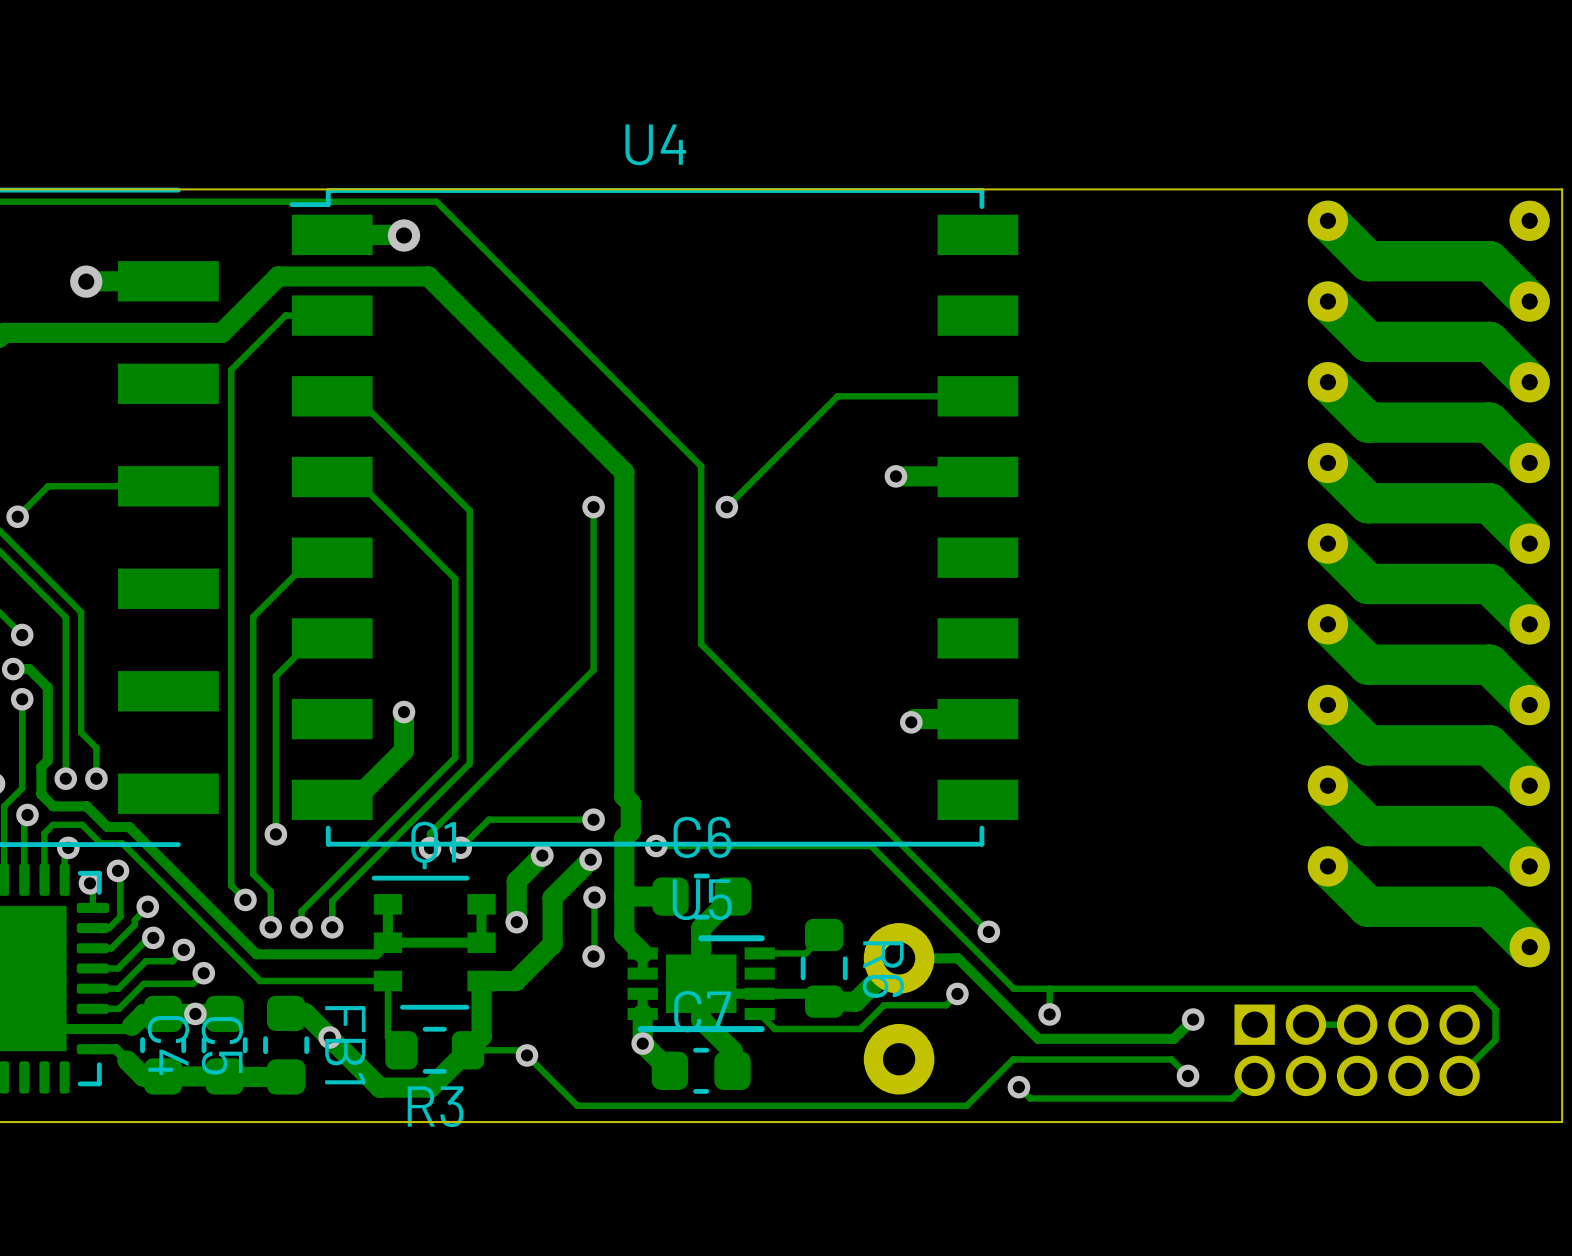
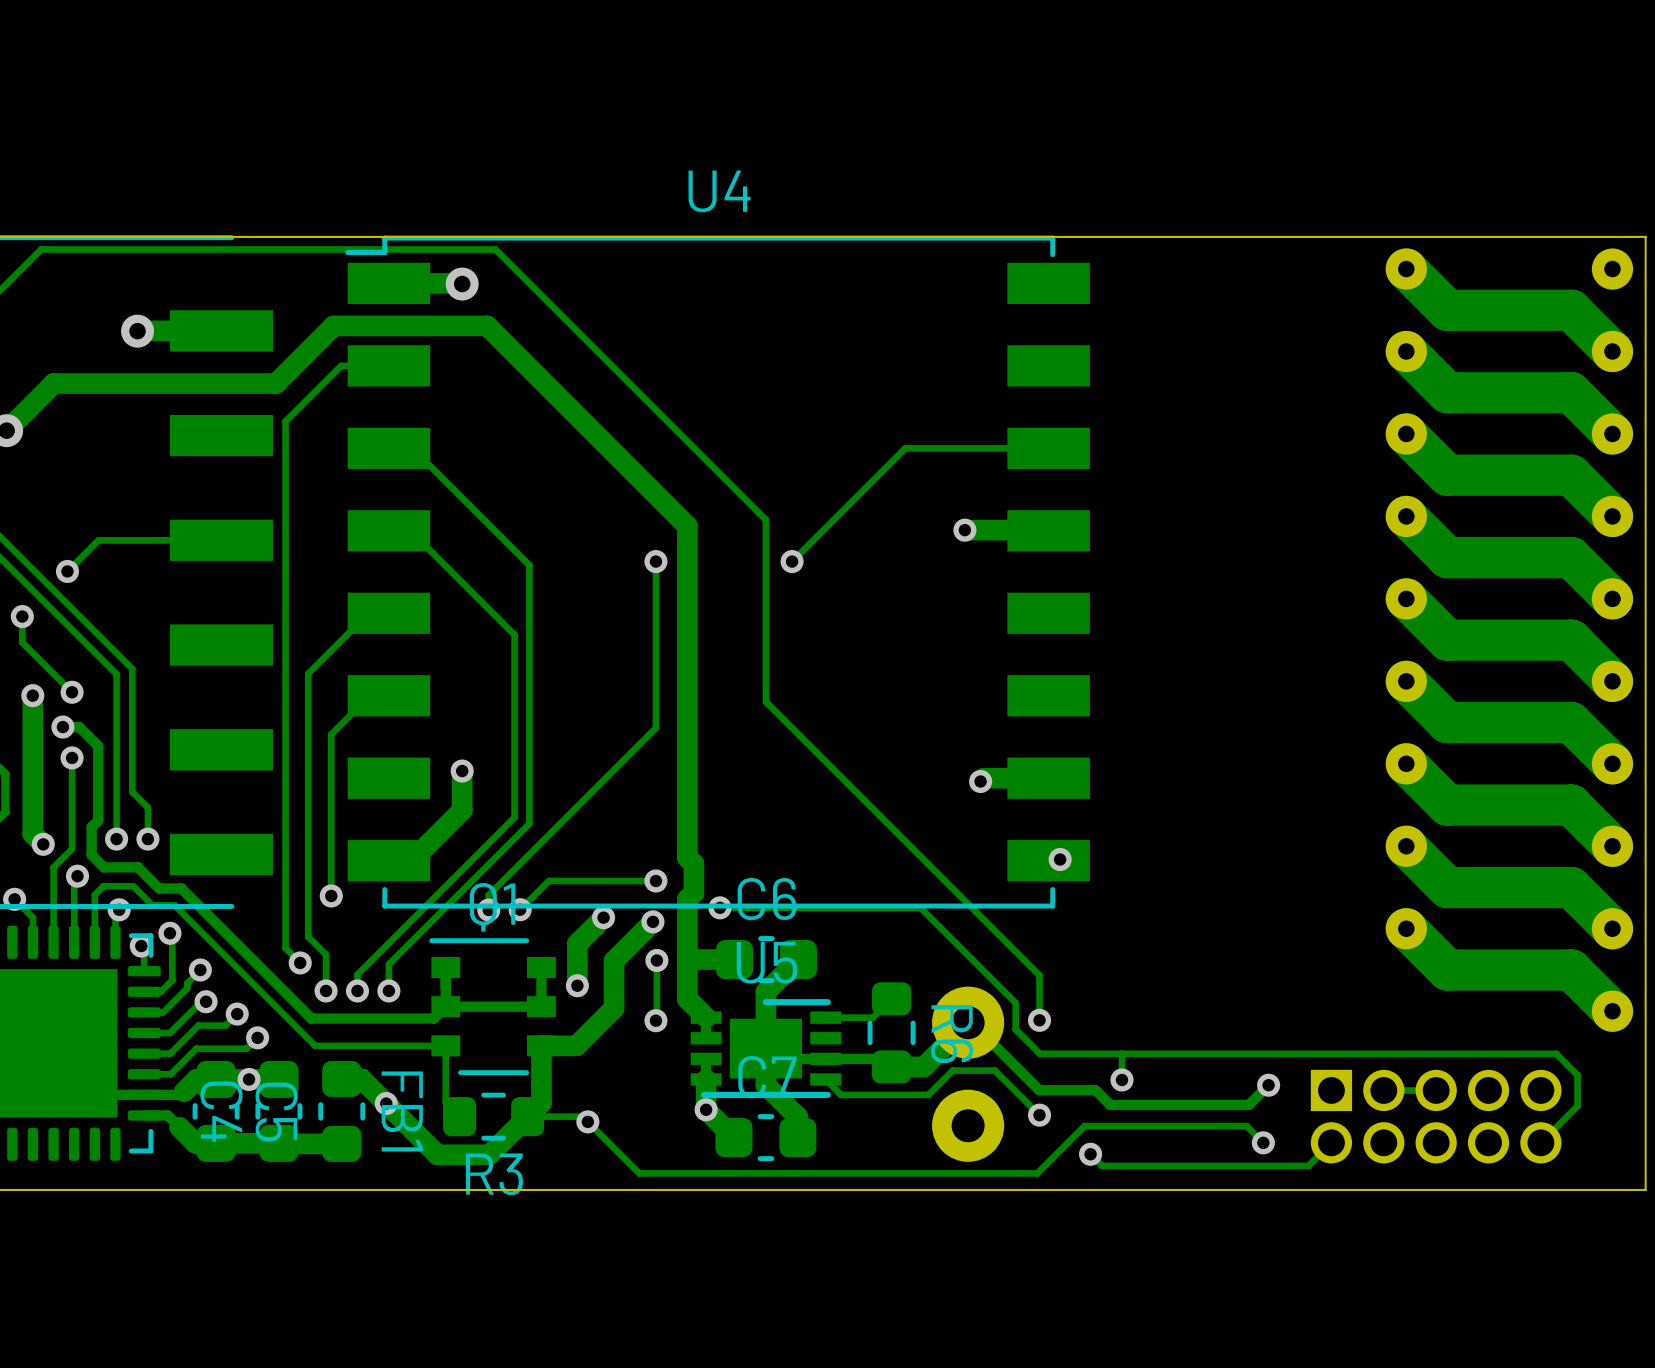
via: none -> (1060, 859)
track: (852, 845) (870, 845) (1013, 988) -> (920, 907) (1015, 1002) (1015, 1029) (1040, 1053) (1085, 1053)
track: (968, 912) (988, 931) -> (1039, 975) (1039, 1020)
via: (988, 931) -> none
via: none -> (1039, 1020)
track: (902, 958) (957, 958) (1024, 1024) -> (971, 1022) (1039, 1090) (1095, 1090)
track: (957, 993) (946, 1005) (925, 1005) -> (1039, 1115) (994, 1070)
via: (957, 993) -> none
via: none -> (1039, 1115)

